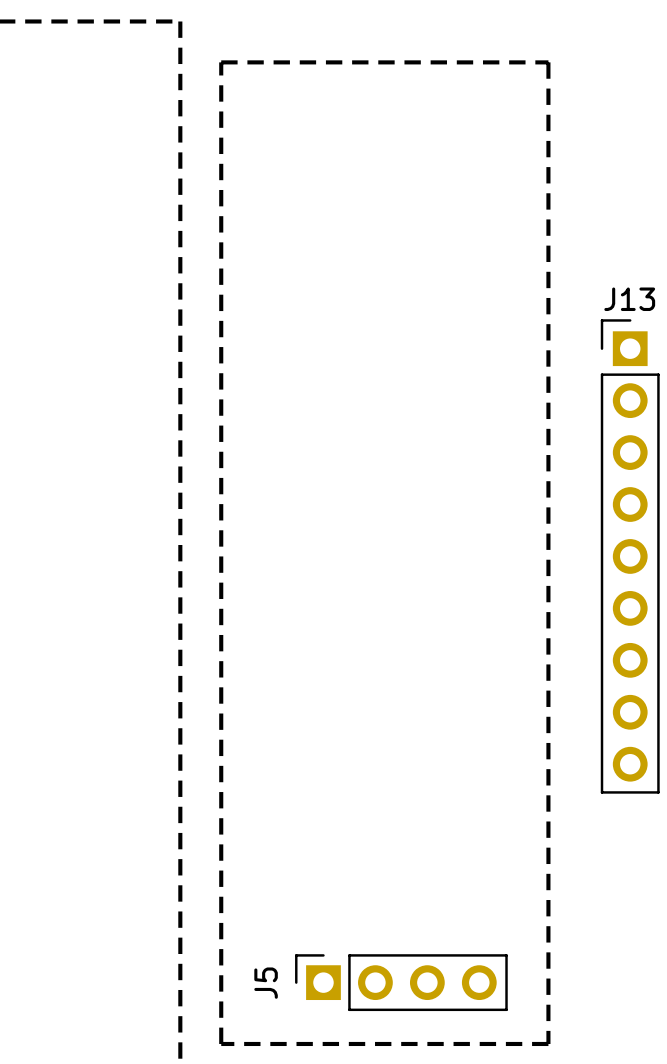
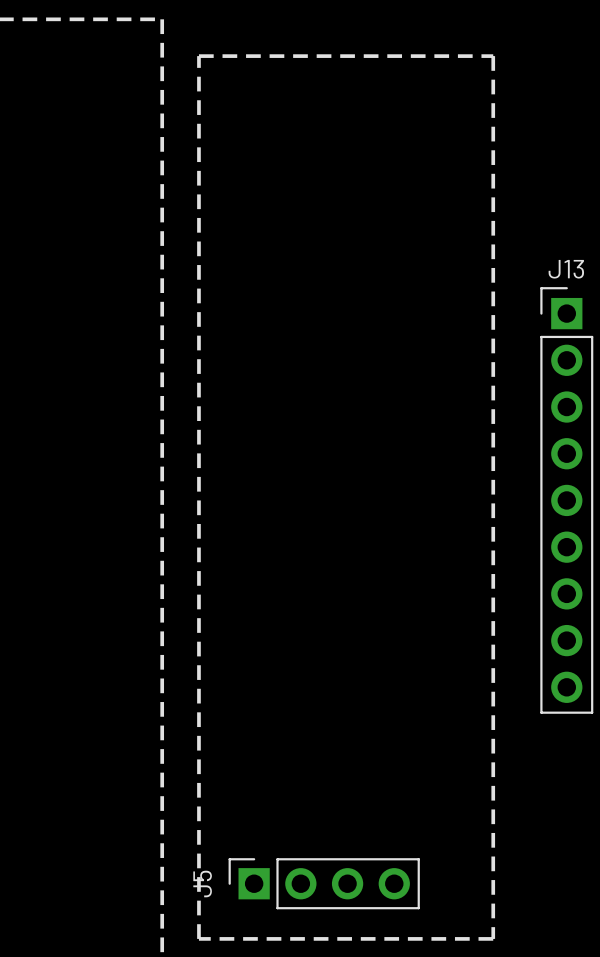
J5 position: (401, 982) -> (324, 883)

